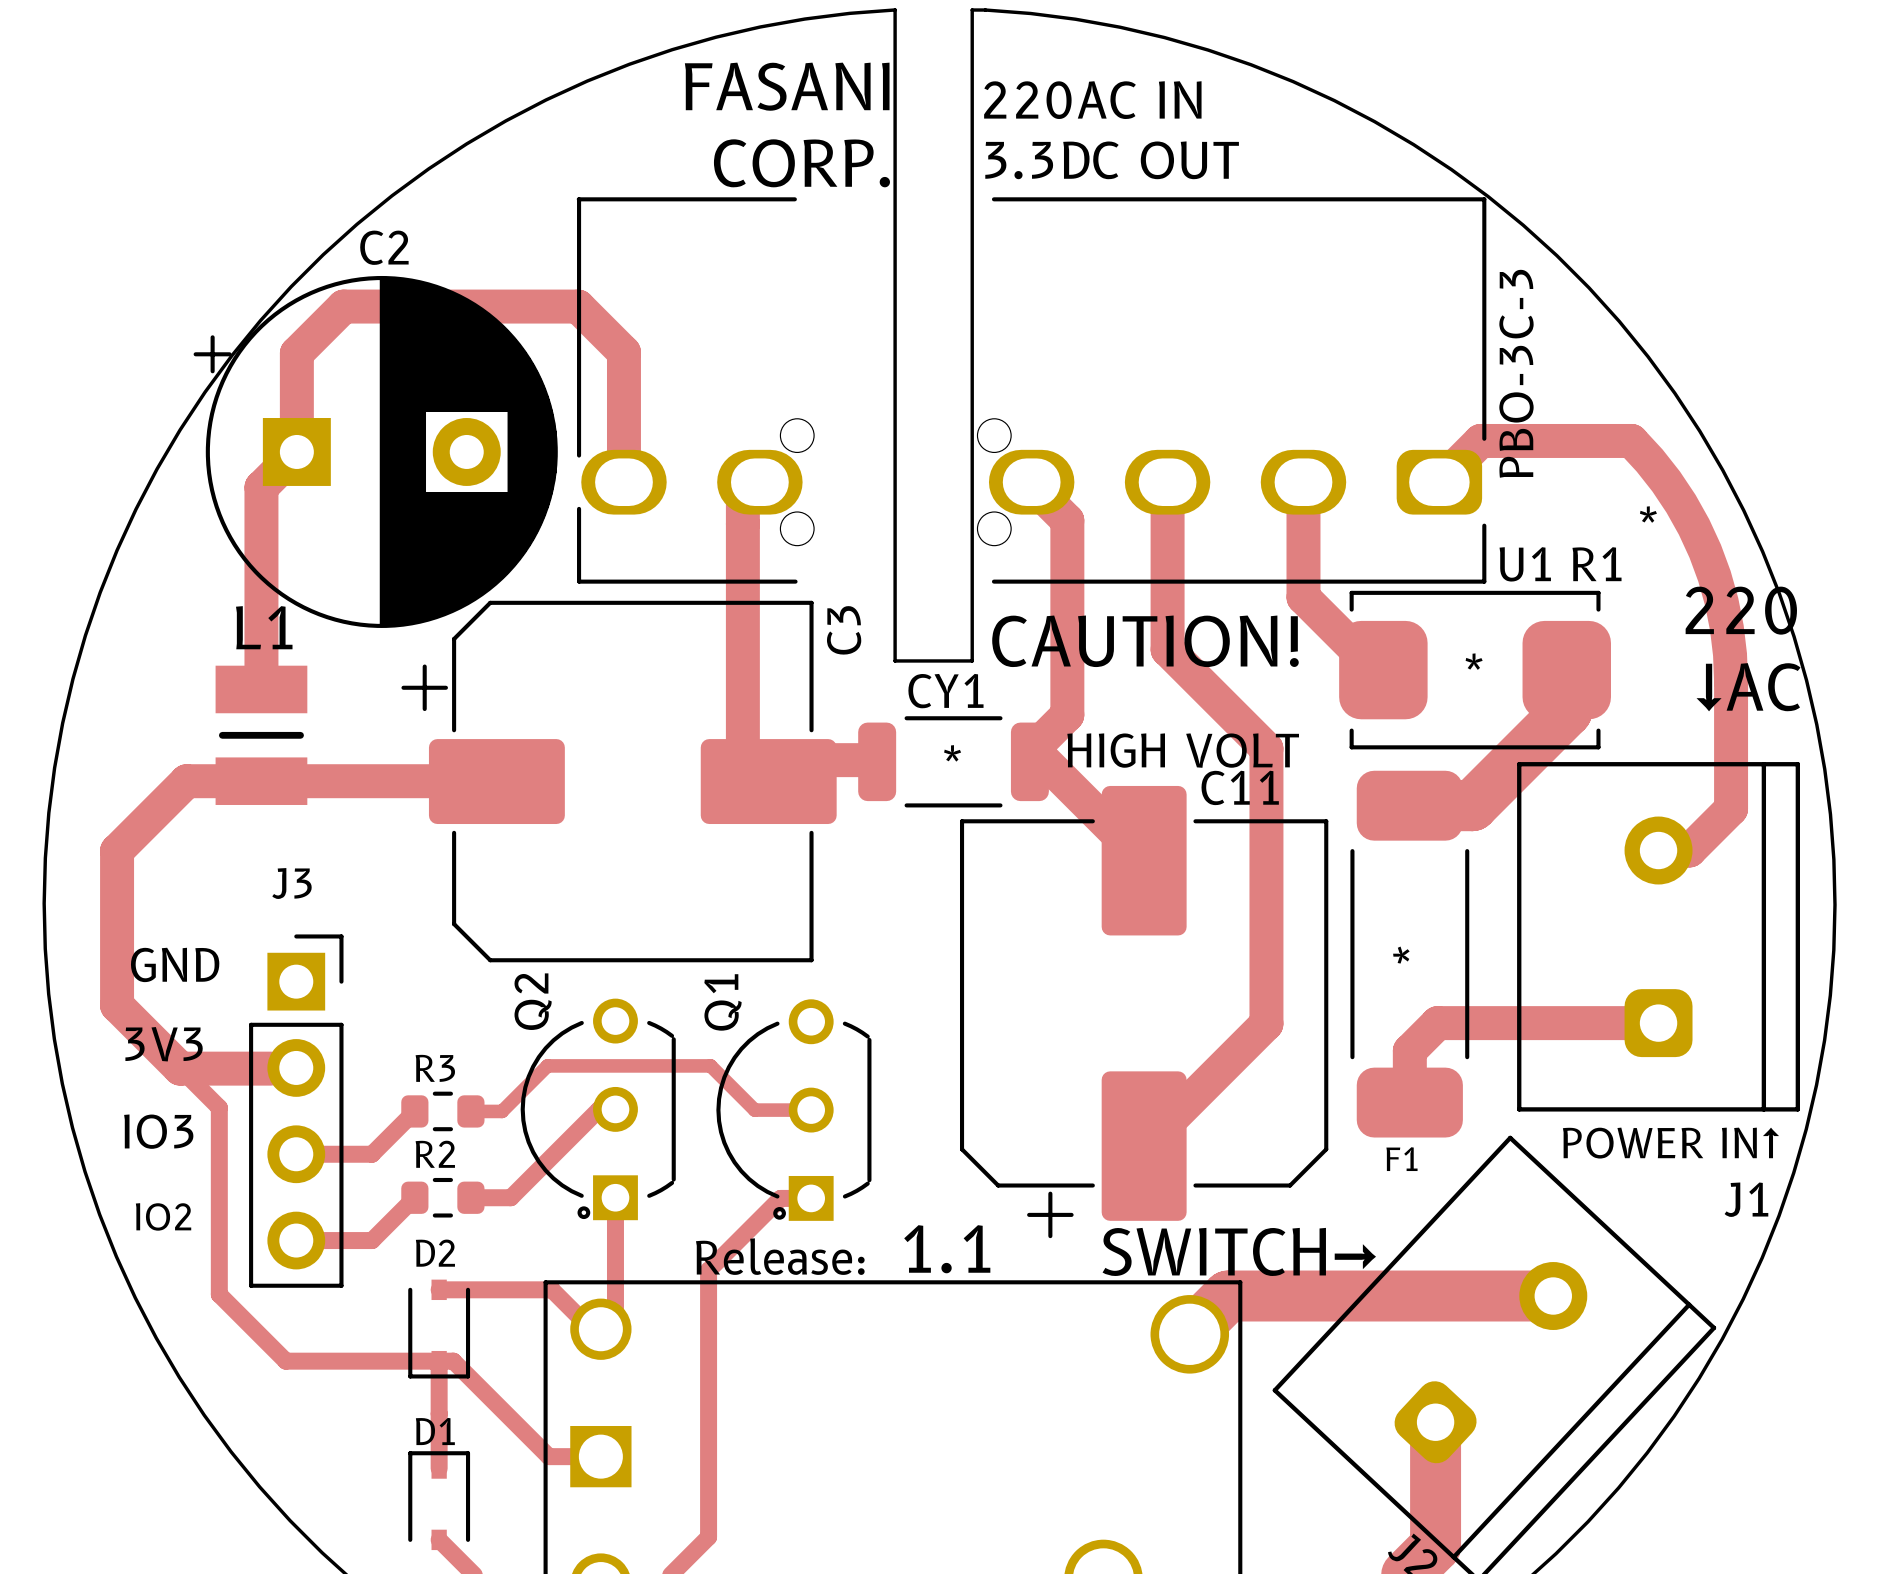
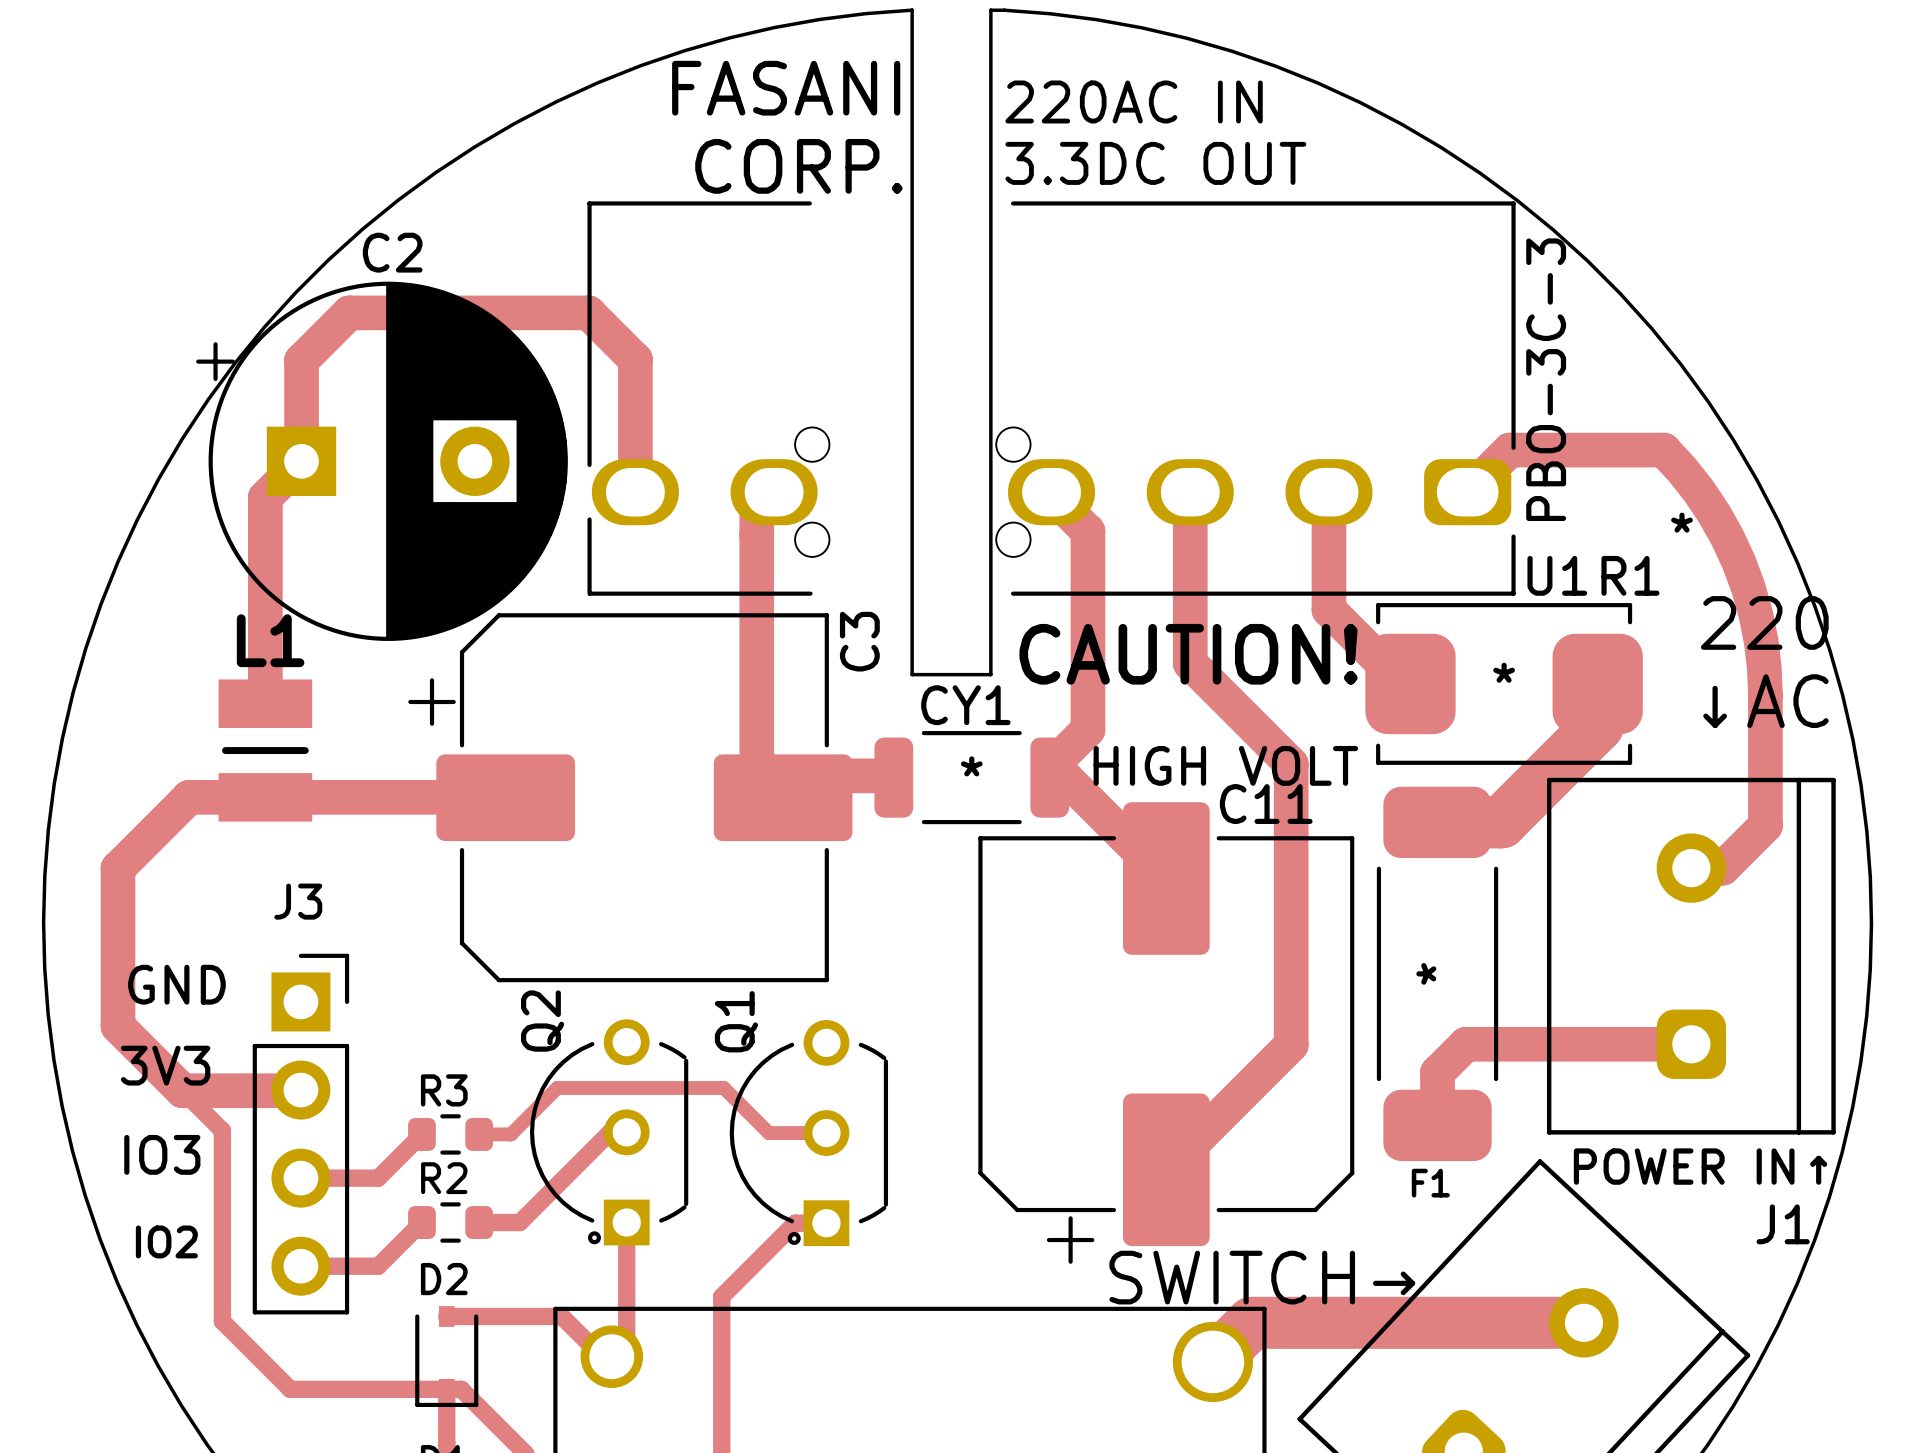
text: 1.1 (947, 1249) -> none
text: Release: (780, 1256) -> none

